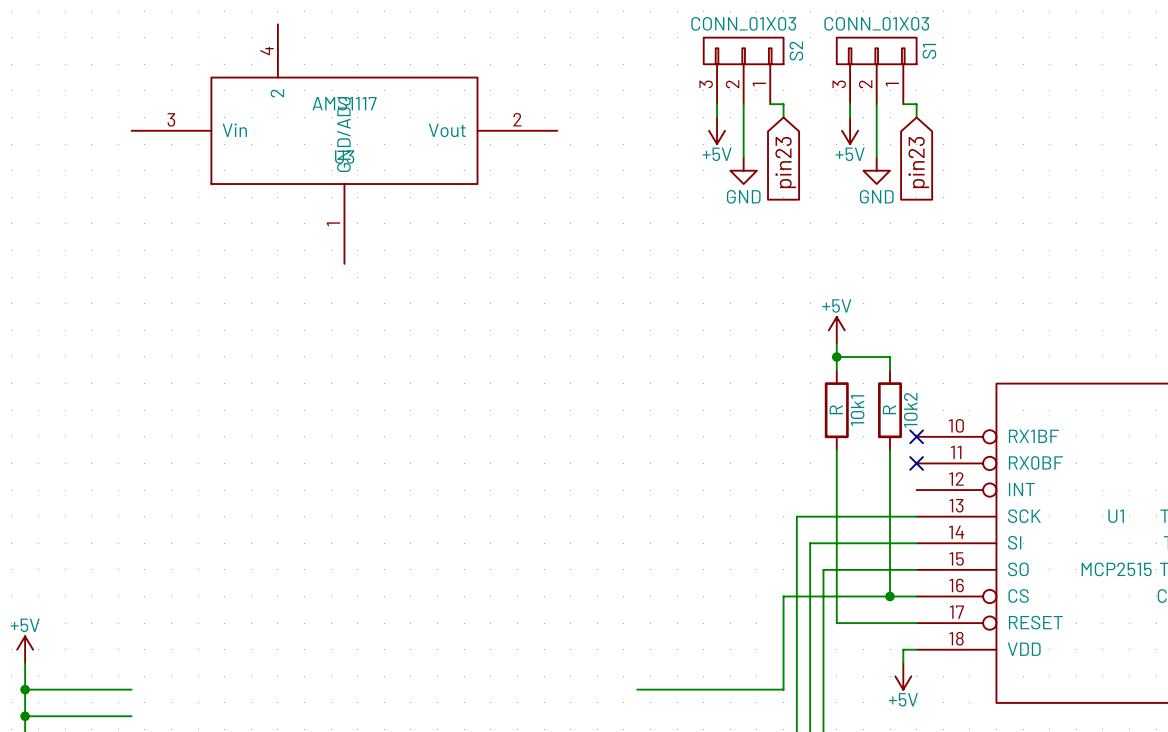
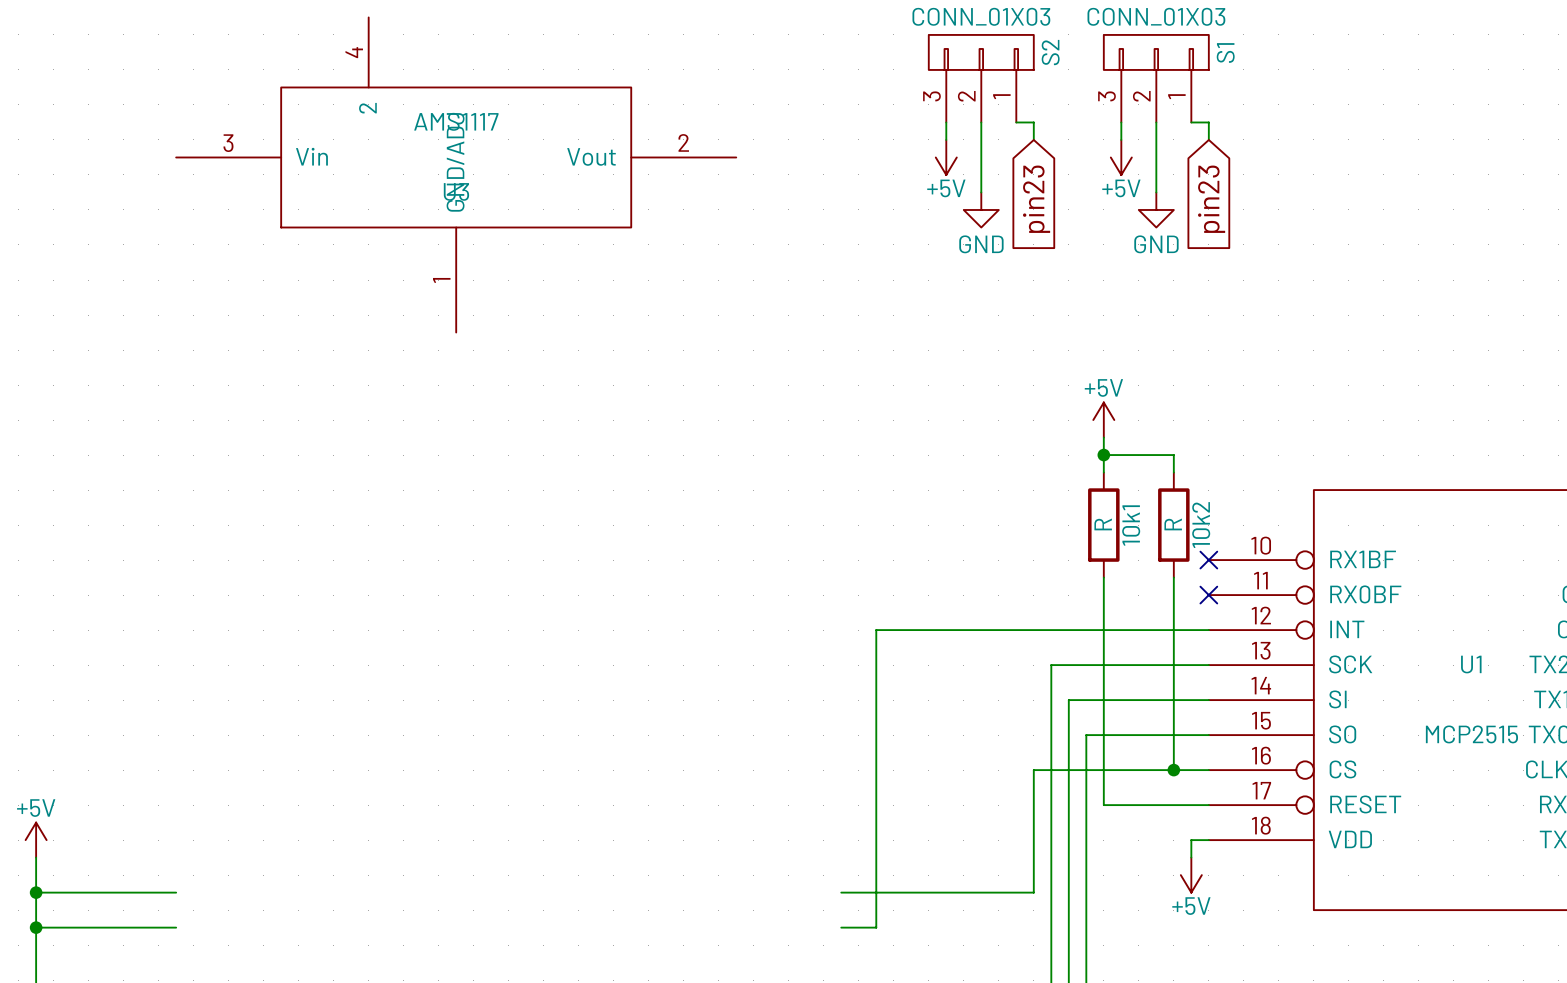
wire: none -> (1208, 630) (876, 630) (876, 927) (841, 927)

